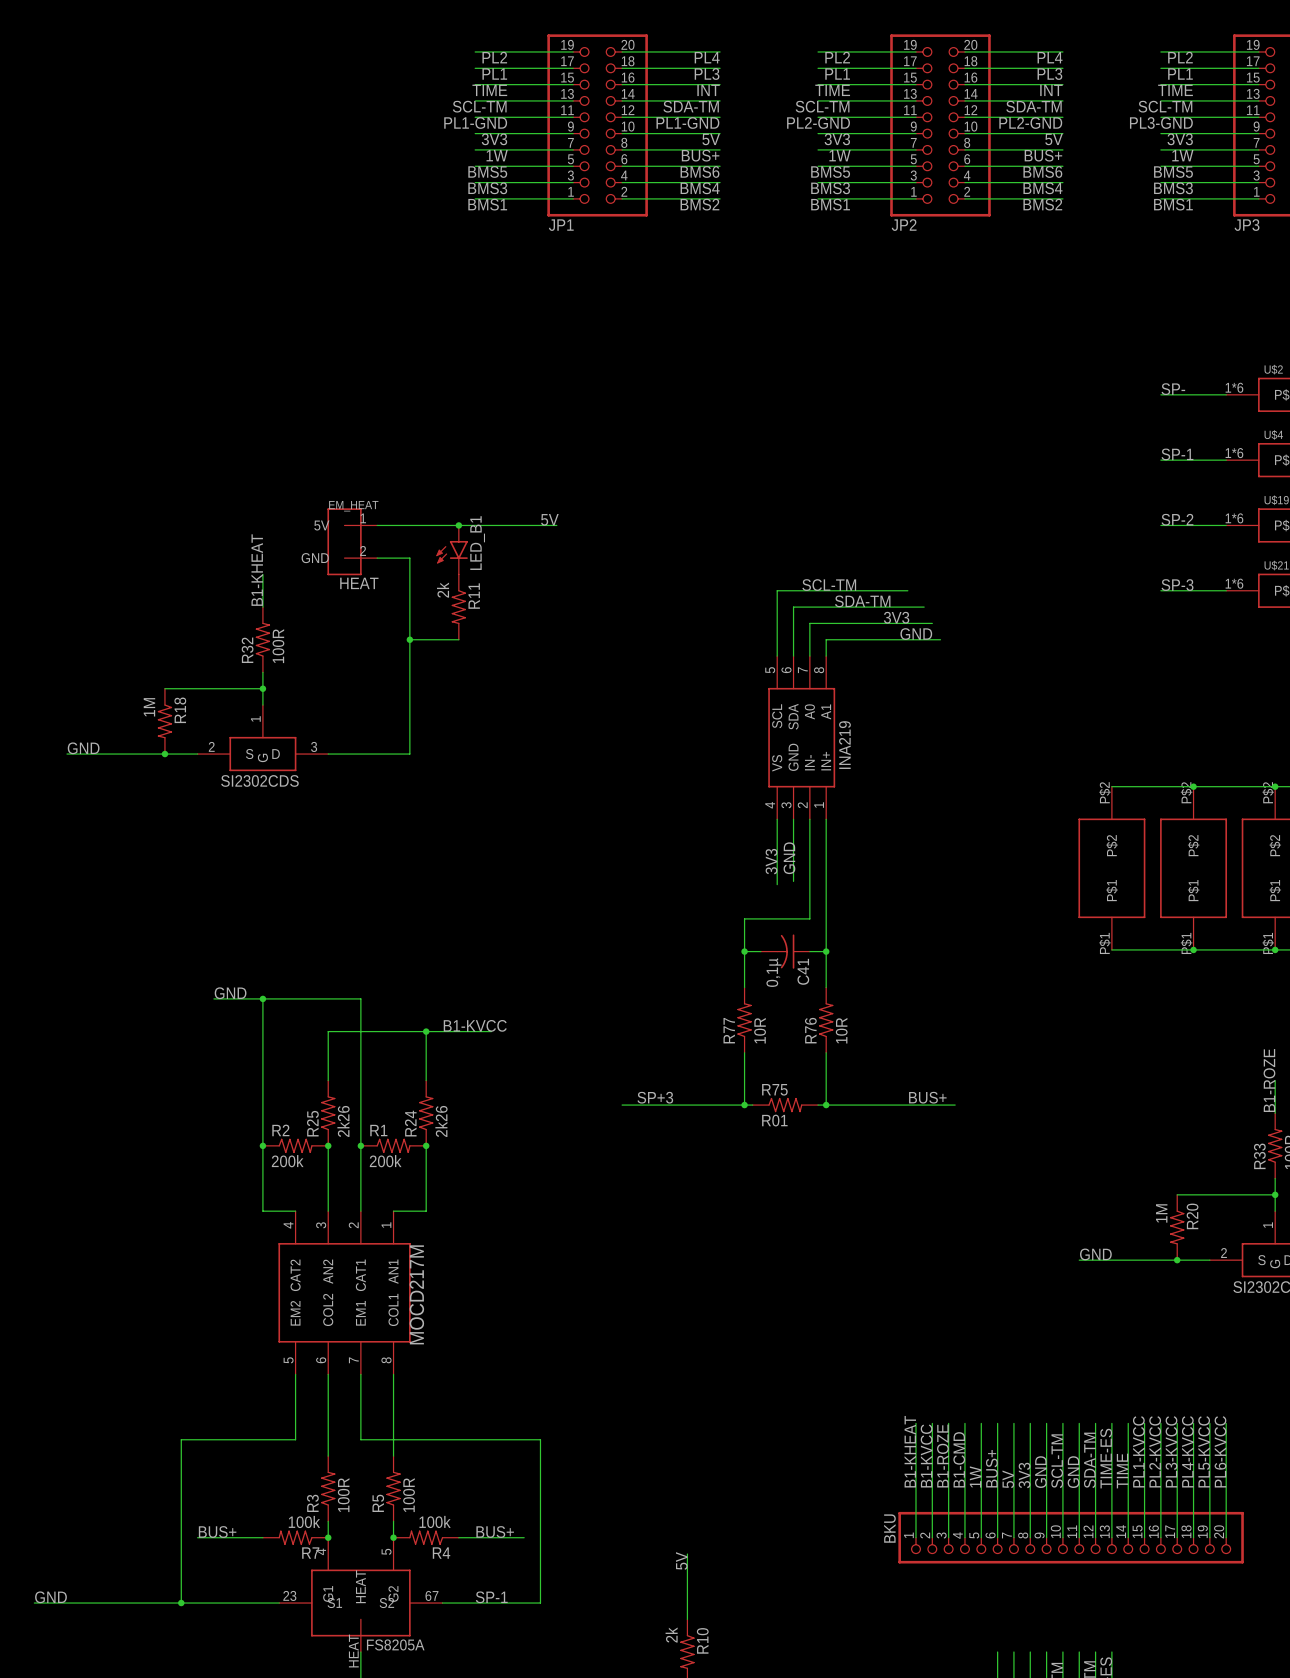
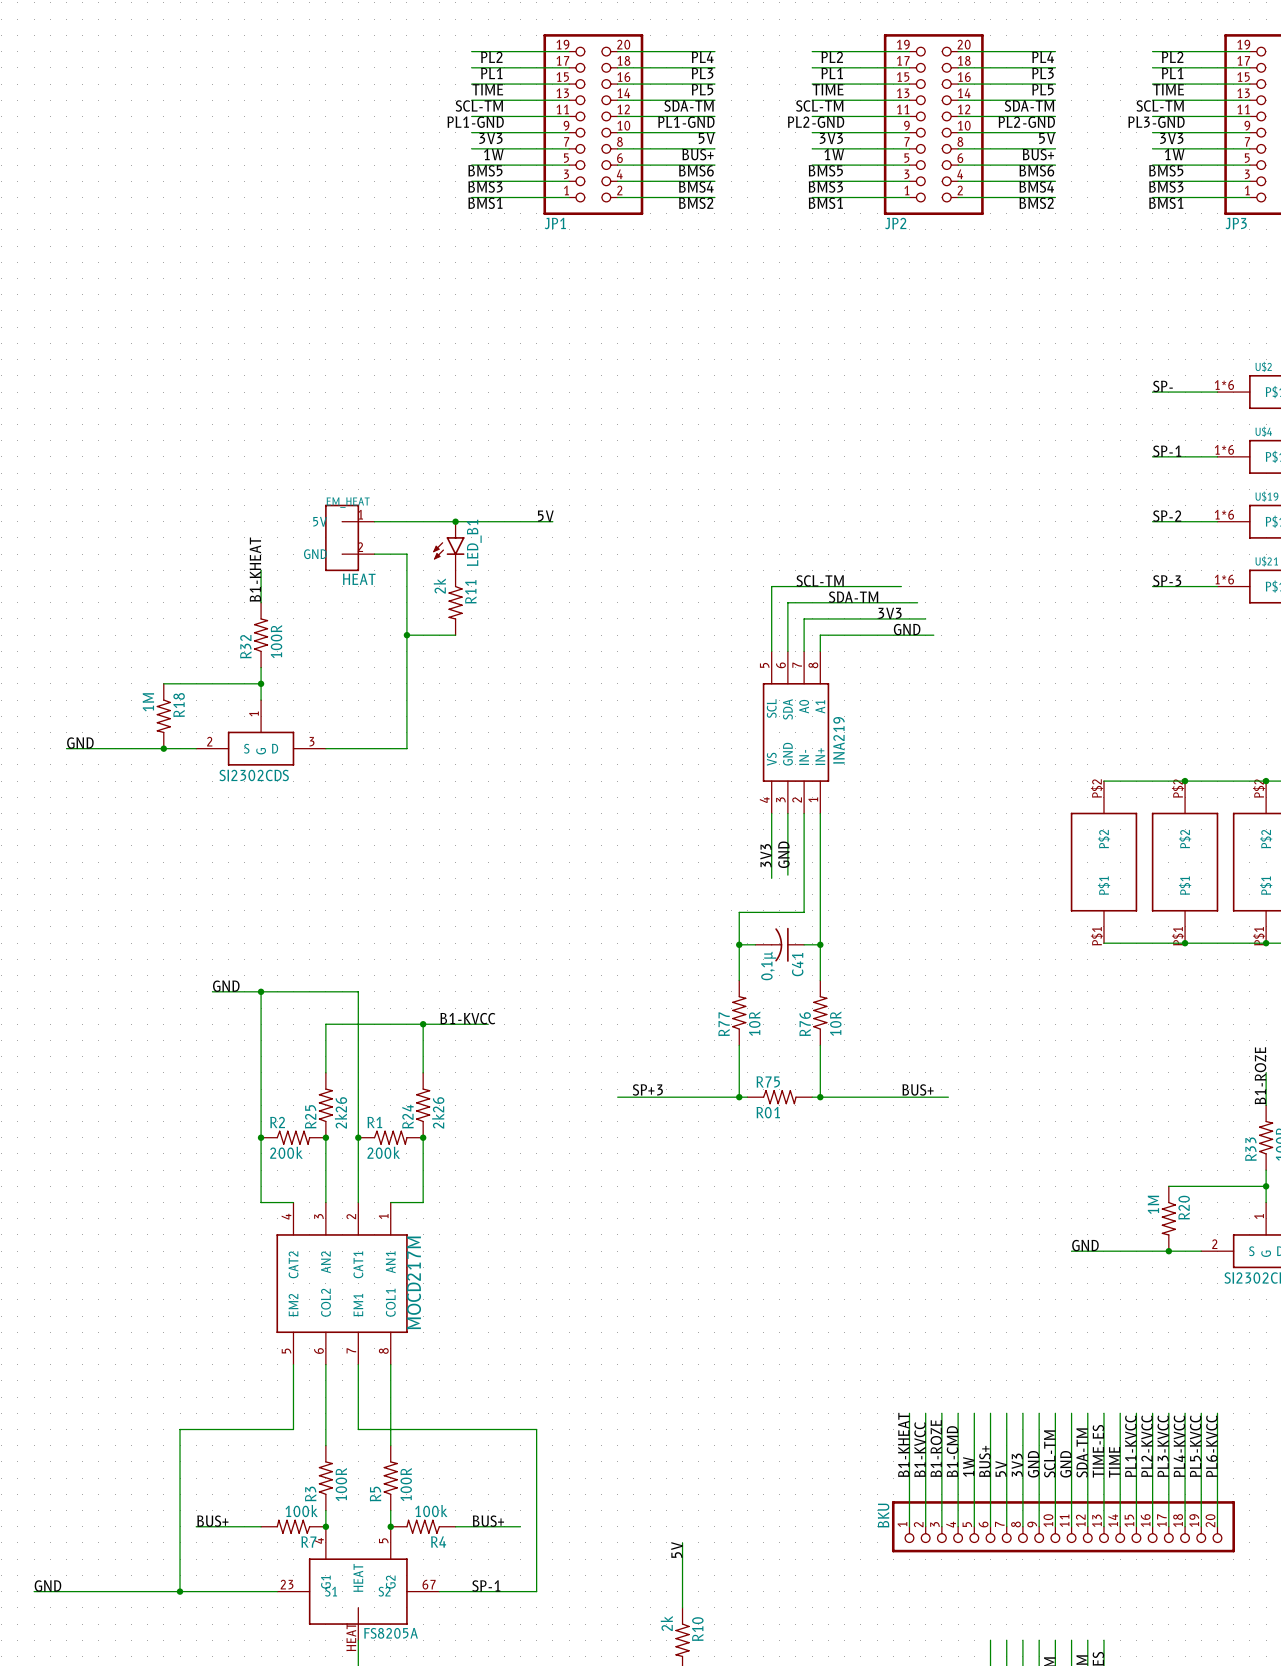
label: INT (708, 90) -> PL5 (702, 89)
label: INT (1051, 90) -> PL5 (1042, 89)

